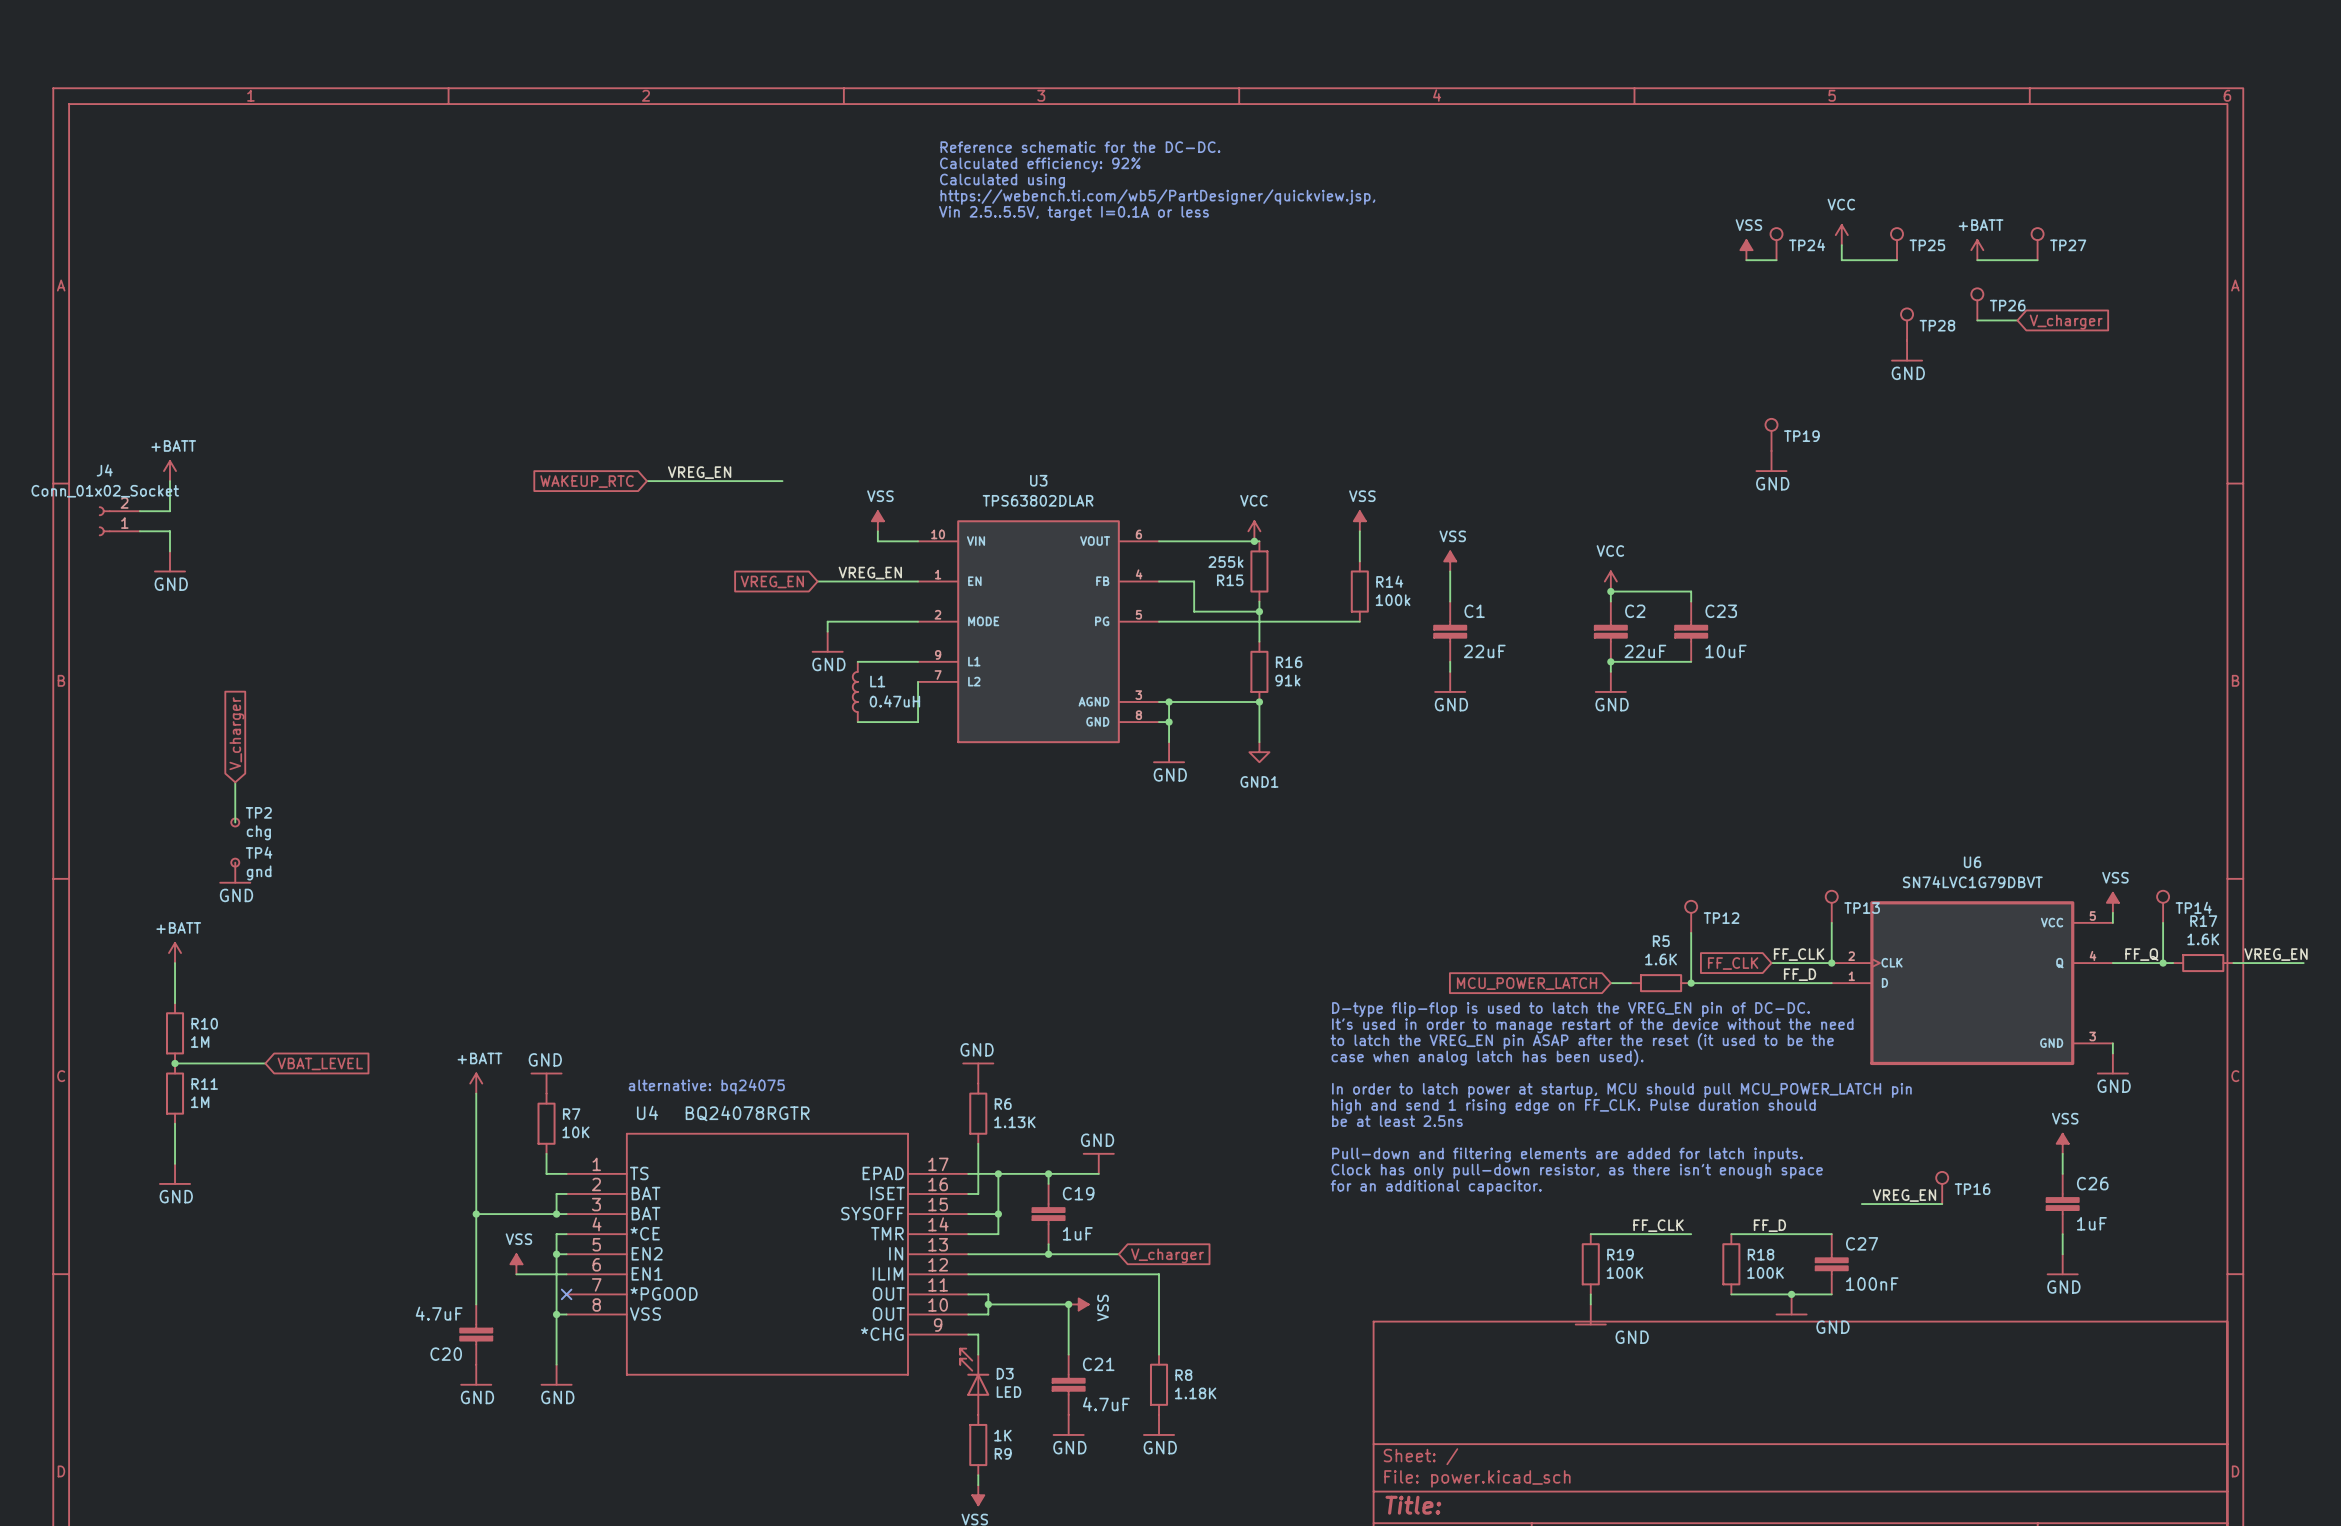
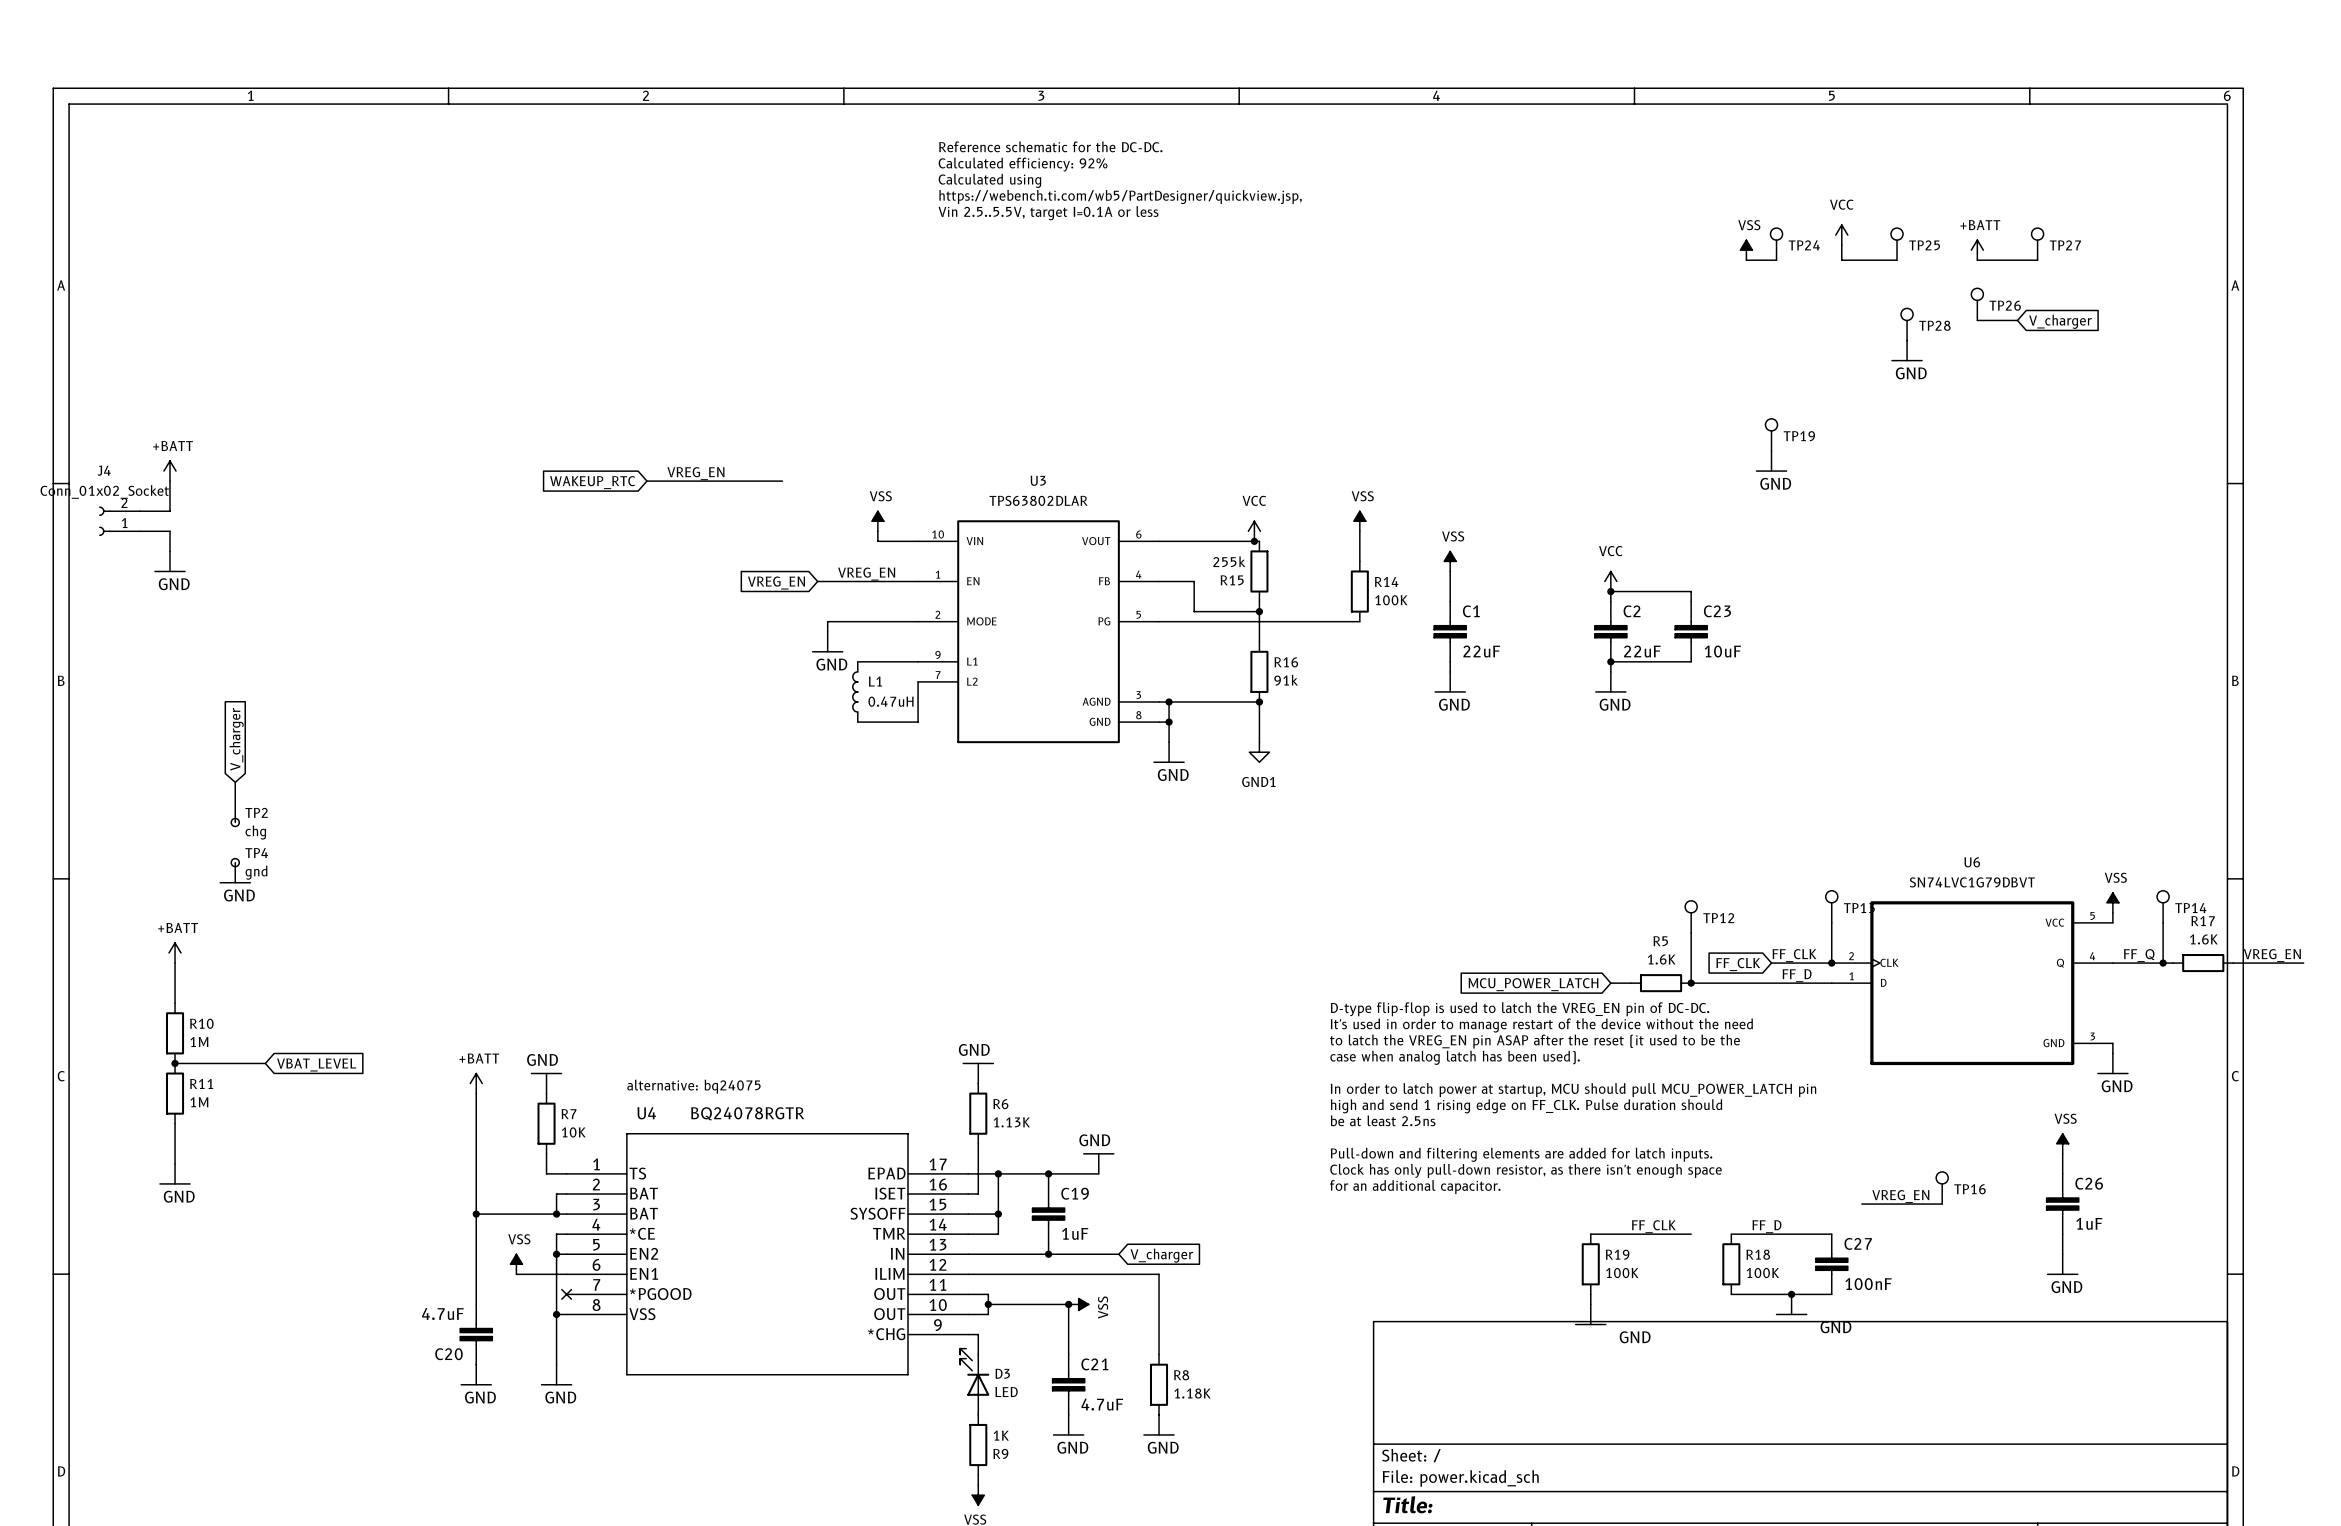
R14 value: 100k (1393, 600) -> 100K (1391, 600)

